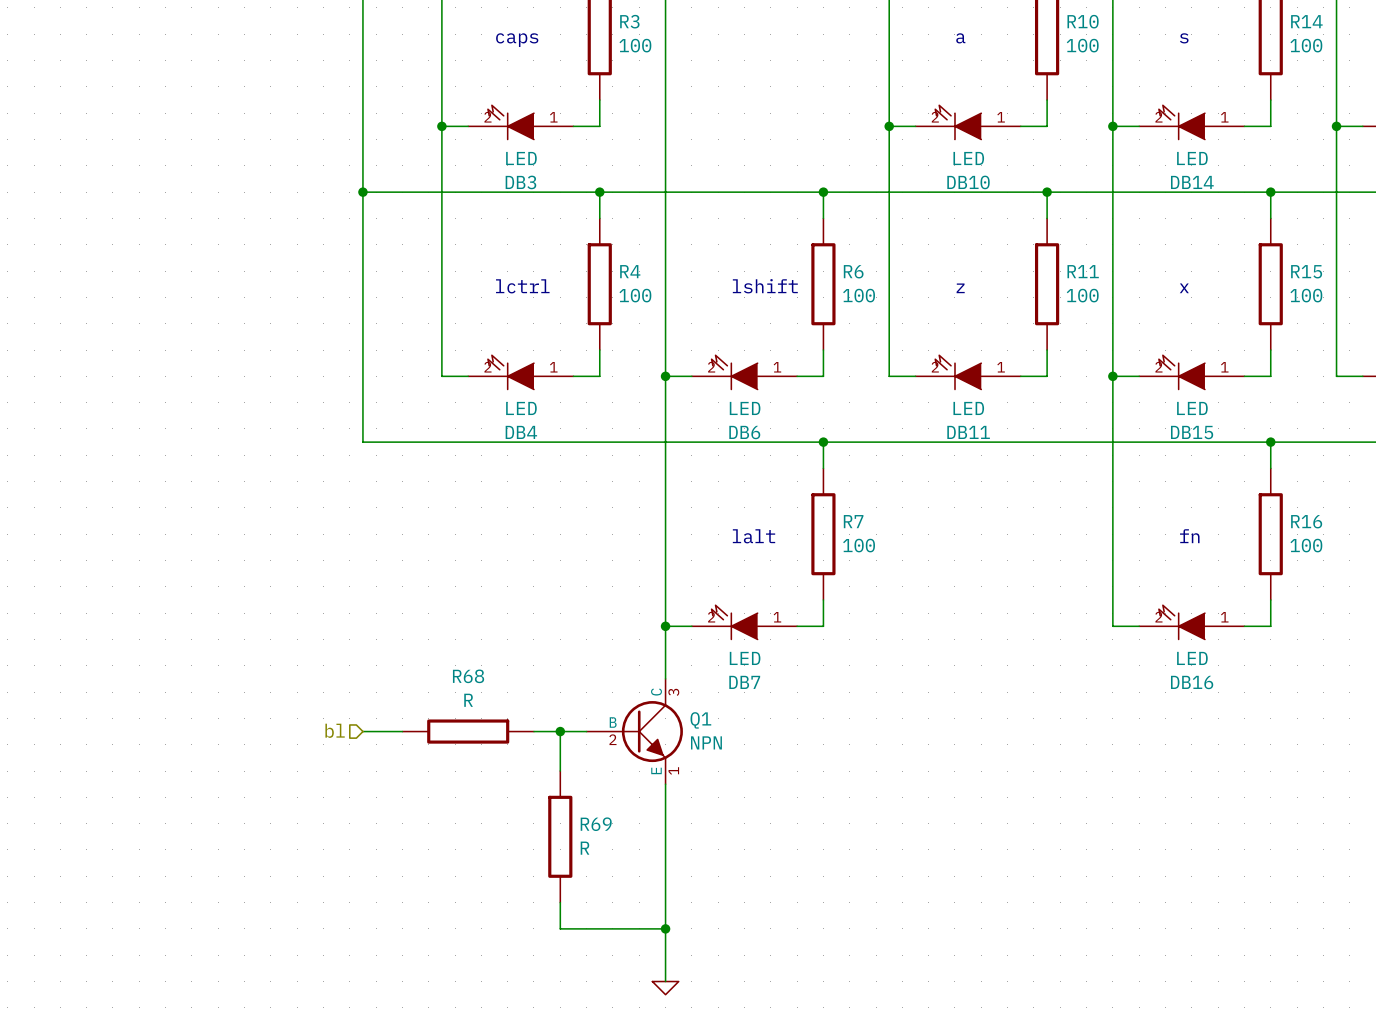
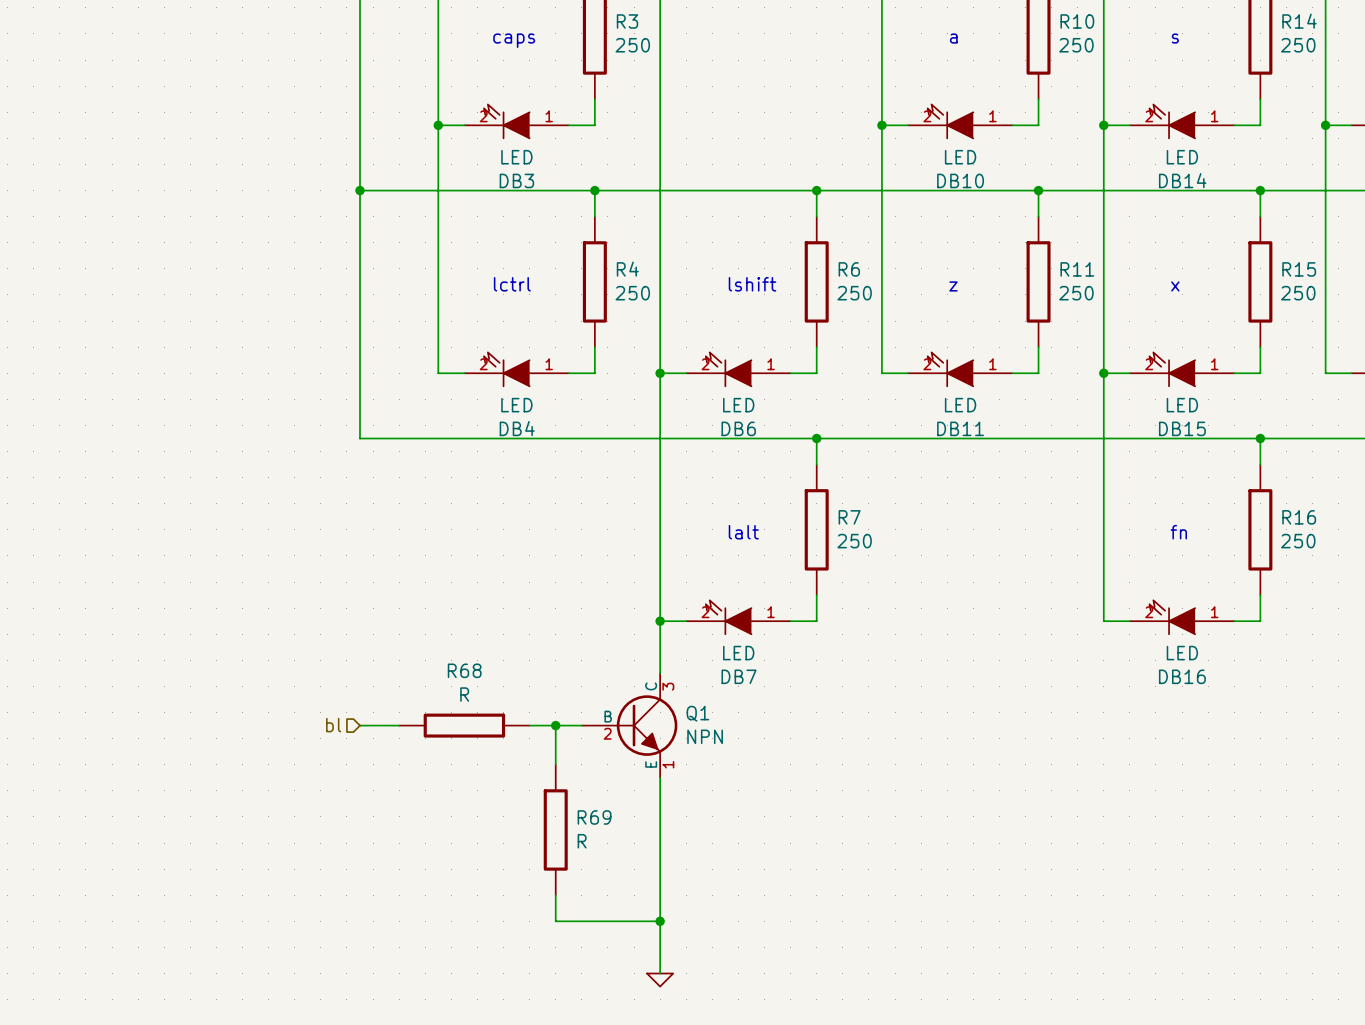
R3 value: 100 (635, 45) -> 250 (632, 45)
R10 value: 100 (1082, 45) -> 250 (1076, 45)
R14 value: 100 (1306, 45) -> 250 (1298, 45)
R4 value: 100 (635, 295) -> 250 (632, 293)
R6 value: 100 (859, 295) -> 250 (854, 293)
R11 value: 100 (1082, 295) -> 250 (1076, 293)
R15 value: 100 (1306, 295) -> 250 (1298, 293)
R7 value: 100 (859, 545) -> 250 (854, 541)
R16 value: 100 (1306, 545) -> 250 (1298, 541)

